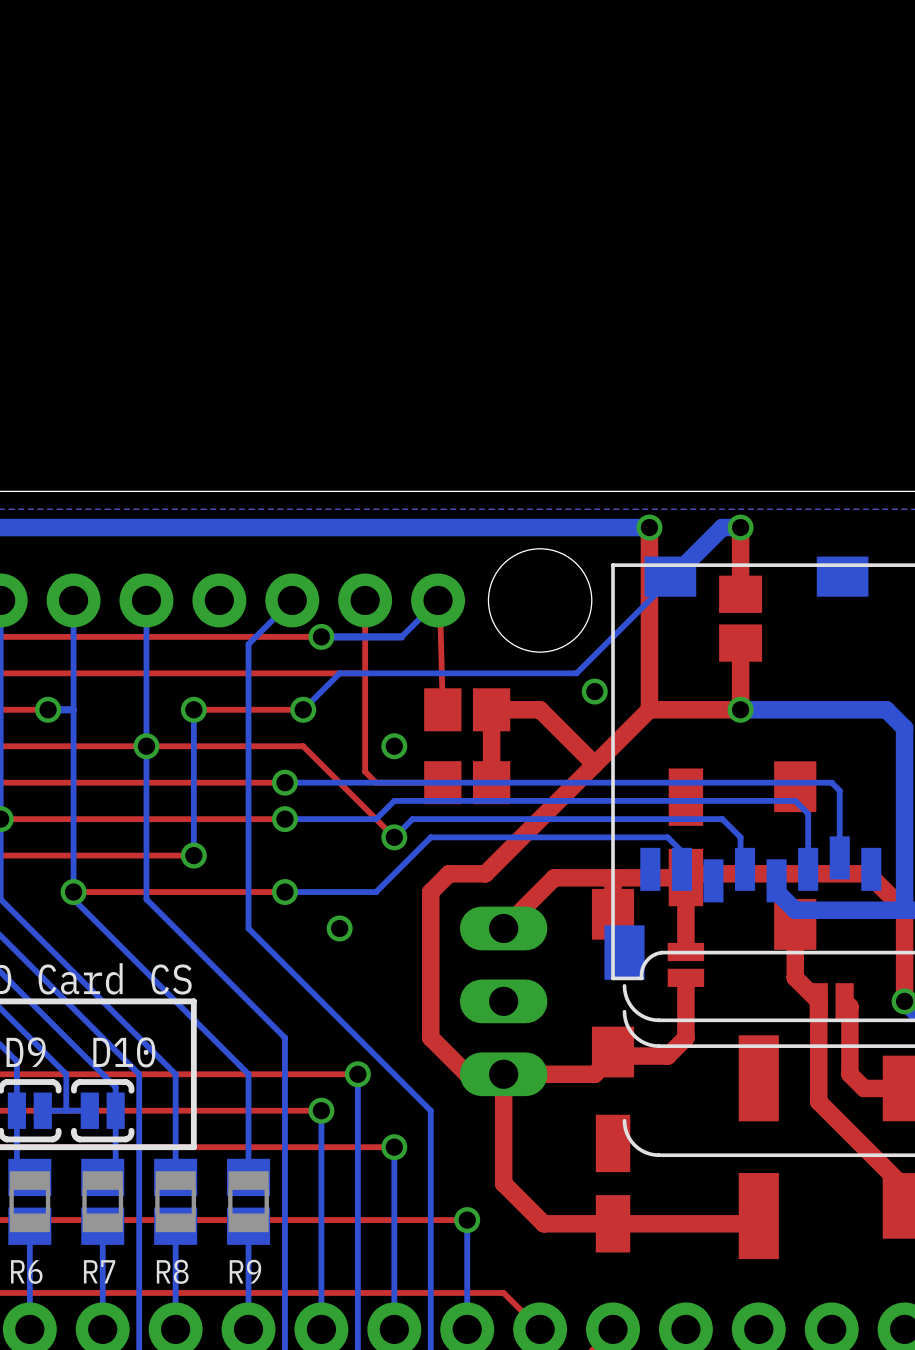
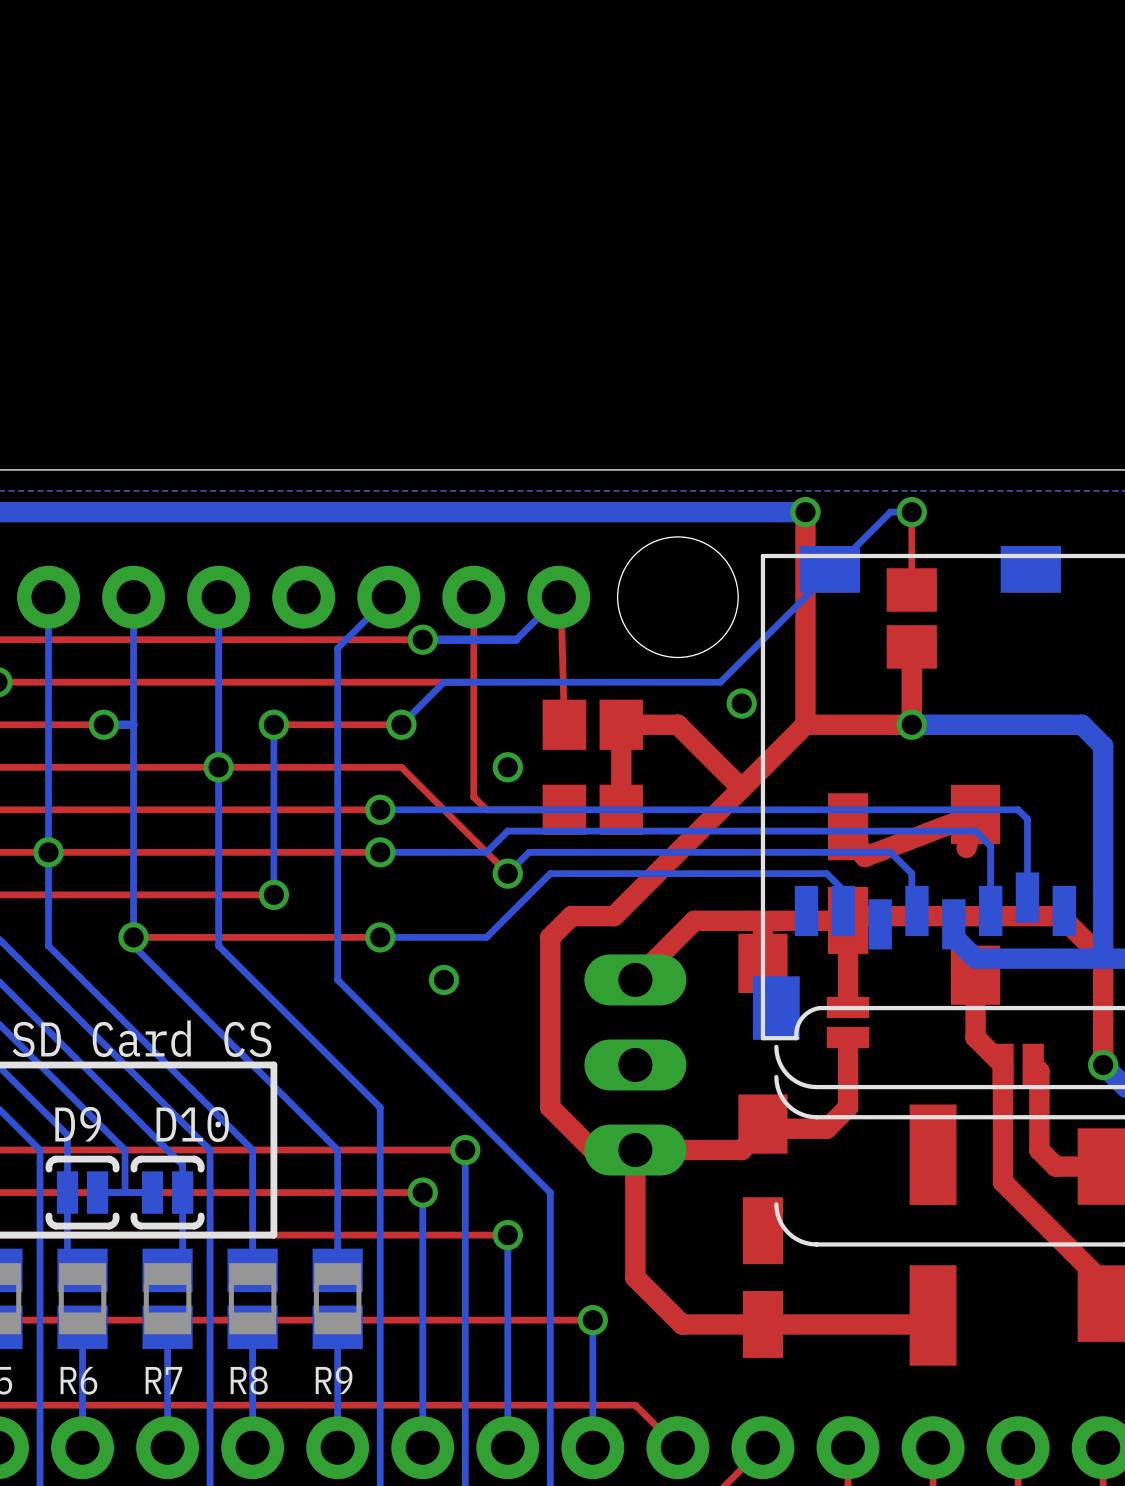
bottom track width: thick (740, 527) (722, 527) (670, 579) -> thin (911, 512) (890, 512) (829, 572)
top track width: thick (740, 527) (740, 594) -> thin (911, 512) (911, 589)
top track: none -> (848, 826) (864, 857) (975, 814) (966, 848)

